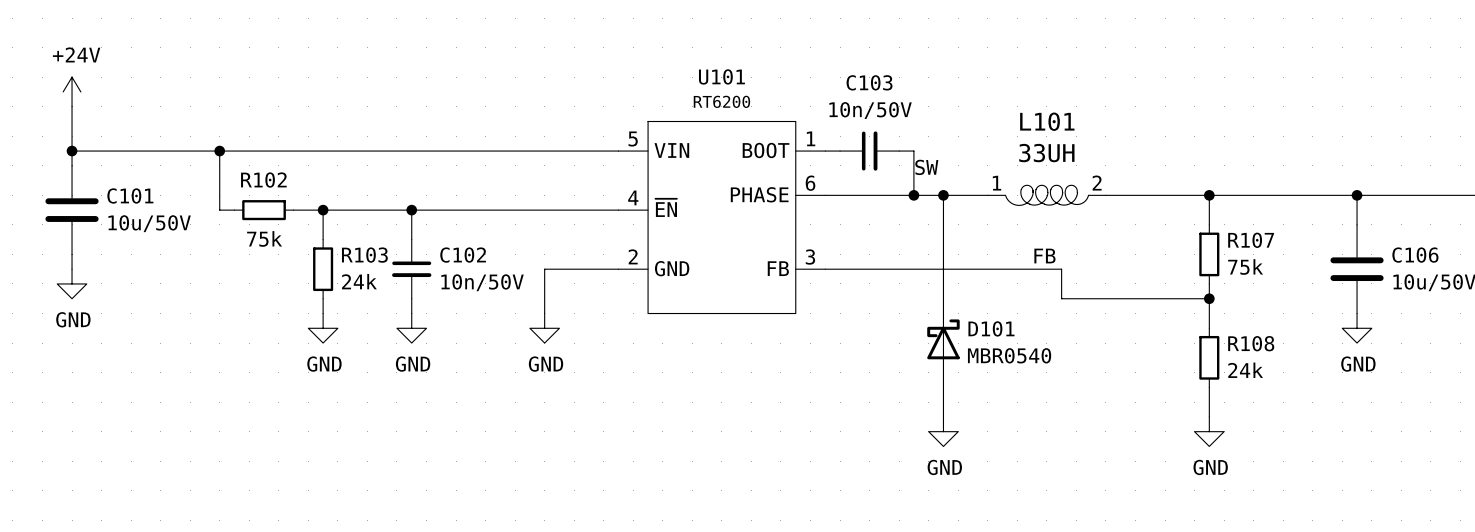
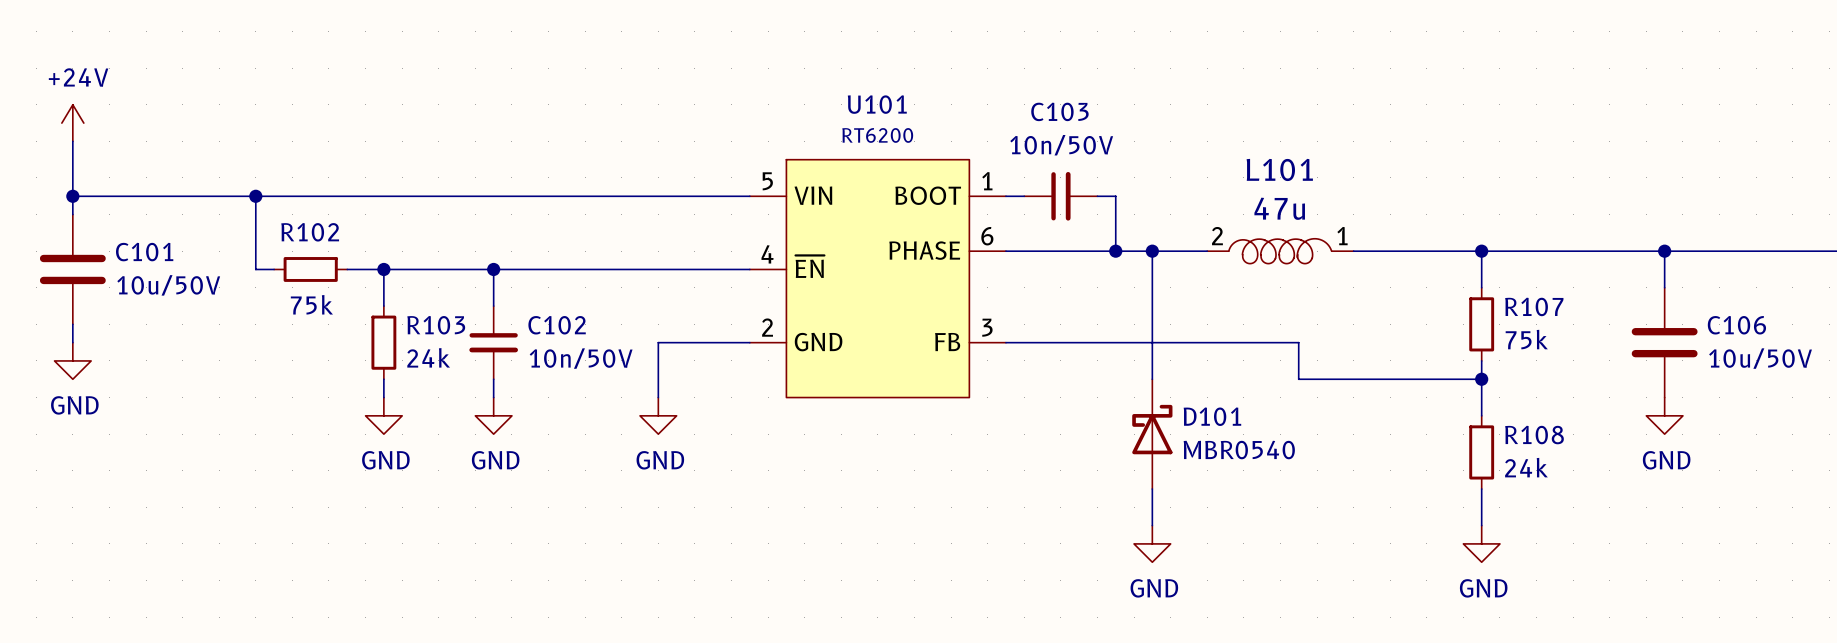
L101 value: 33UH (1046, 153) -> 47u (1279, 208)
label: SW (926, 167) -> none
L101 rotation: 0° (1047, 195) -> 180° (1280, 251)
label: FB (1044, 256) -> none

